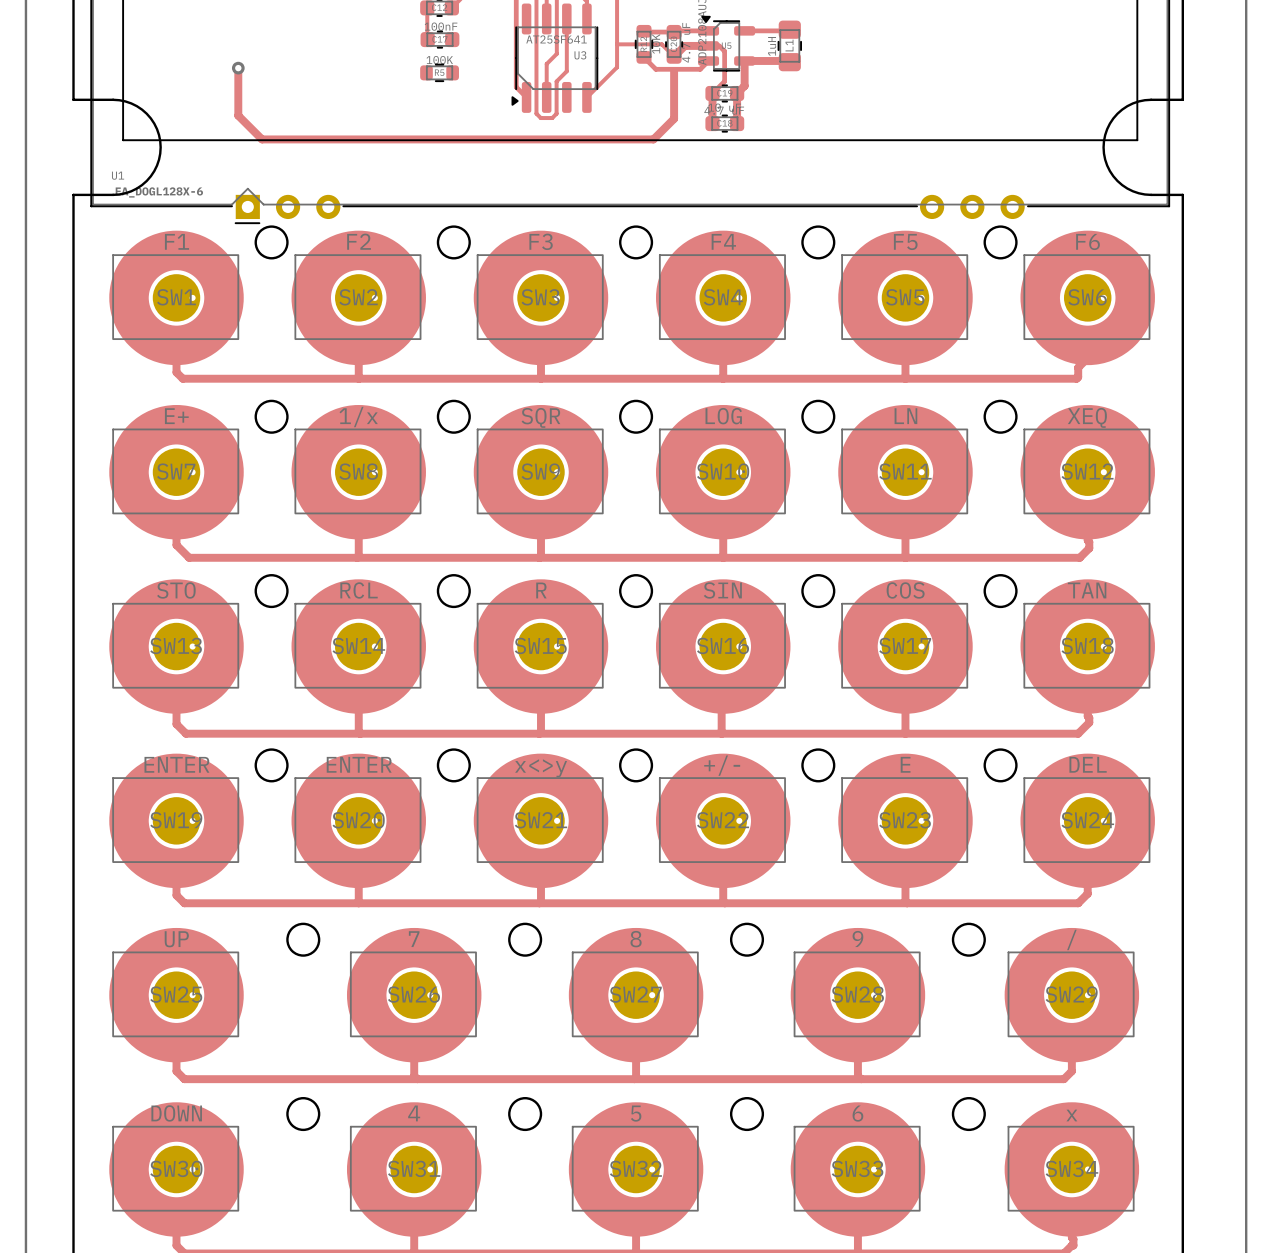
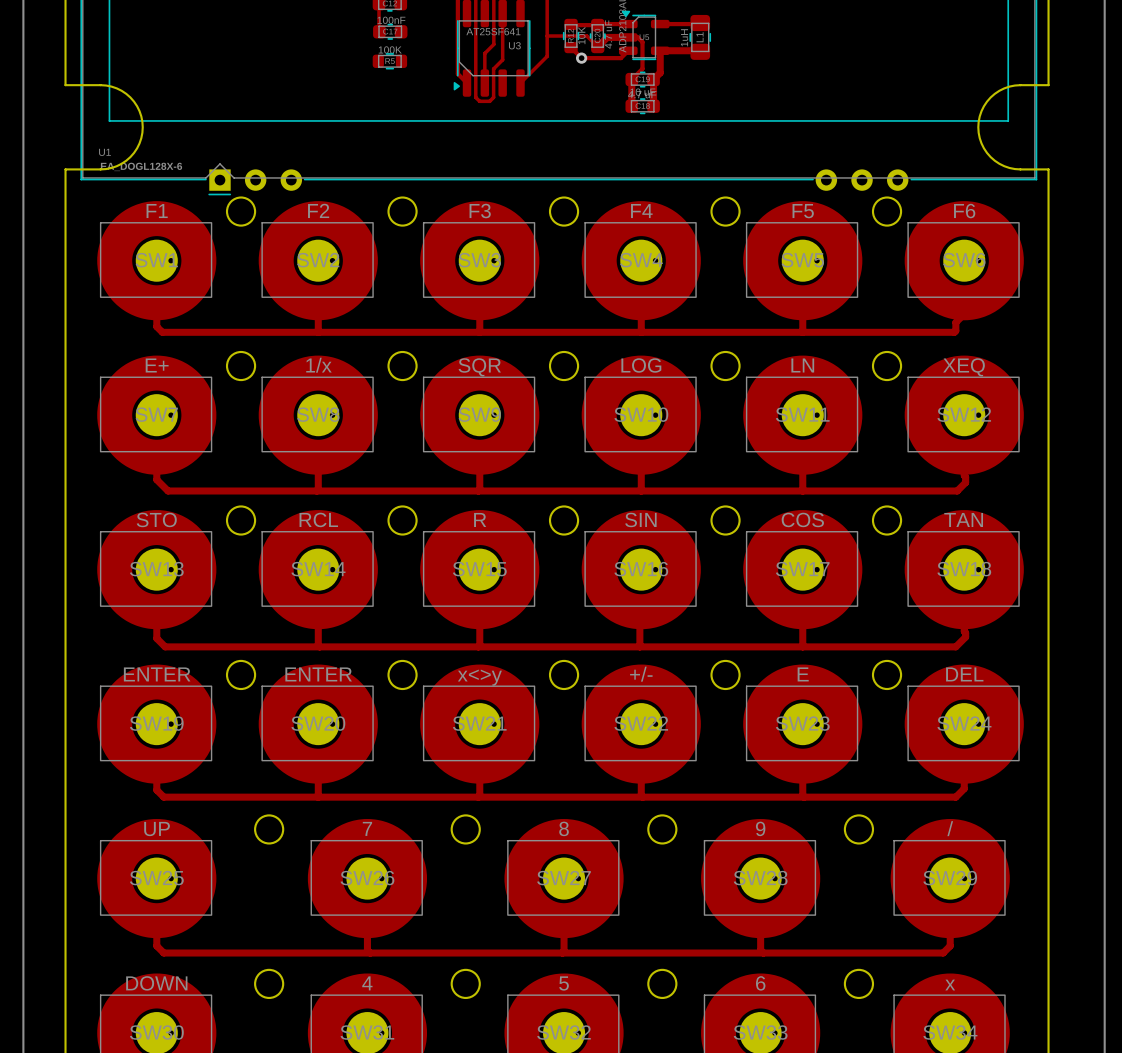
track: (238, 68) (238, 115) (262, 139) (653, 139) (674, 118) (674, 70) -> none
via: (238, 68) -> none
via: none -> (581, 58)

